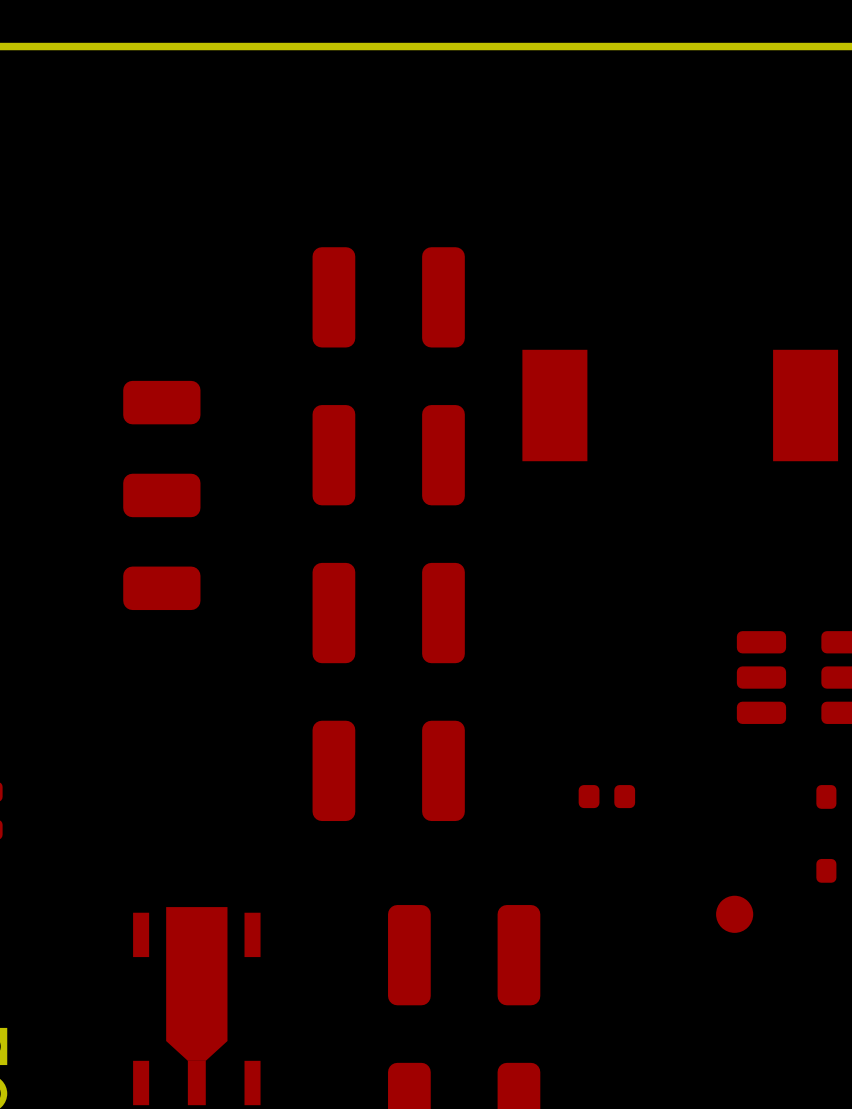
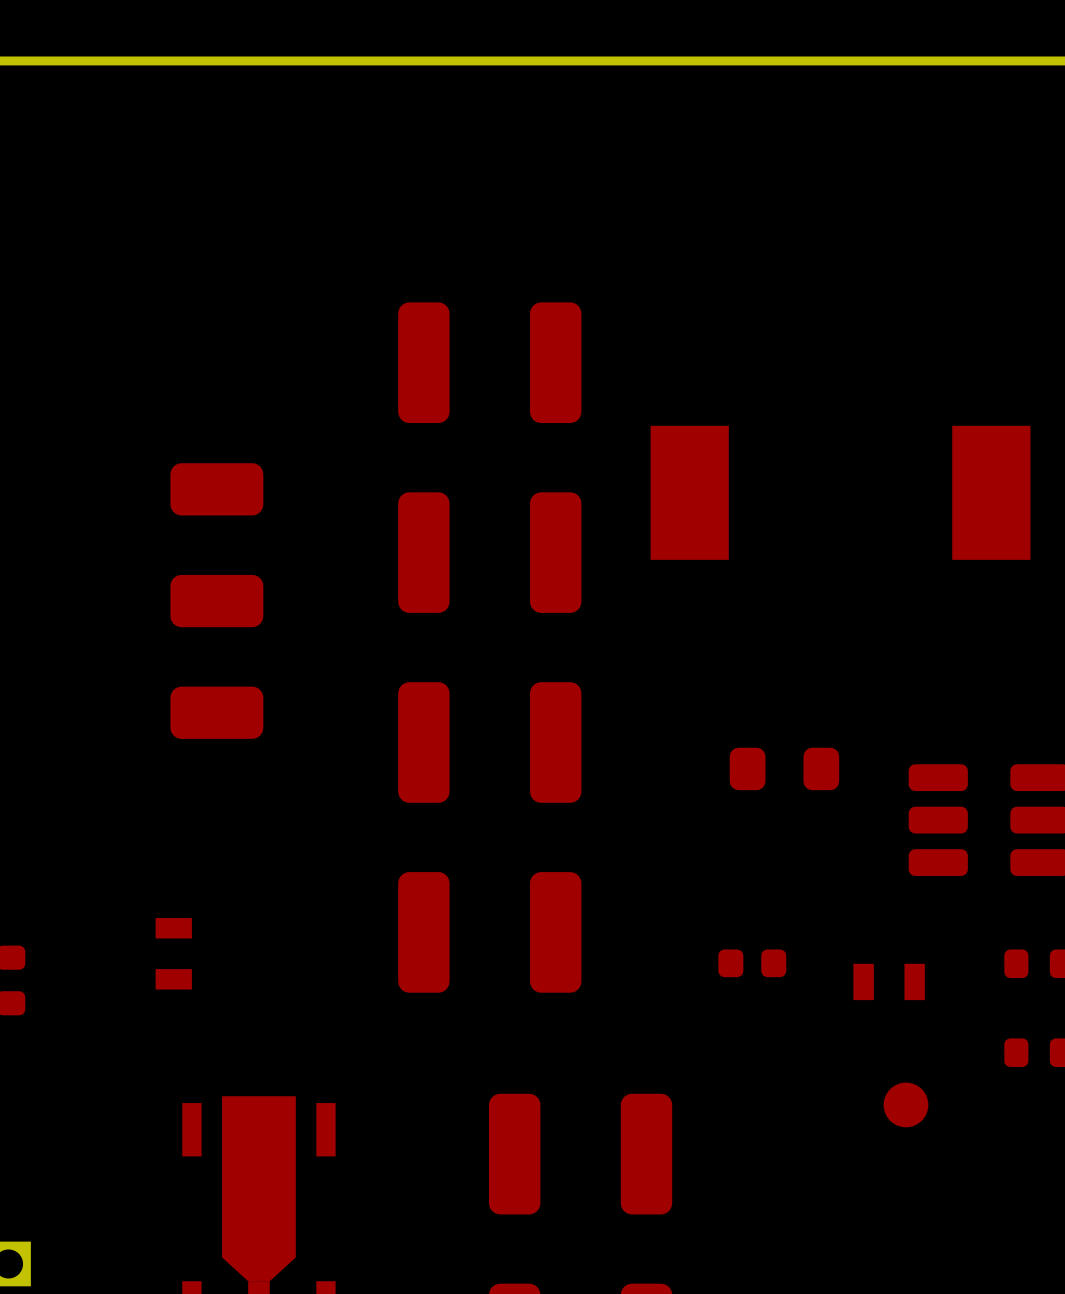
part: none -> (784, 768)
part: none -> (173, 953)
part: none -> (889, 981)

